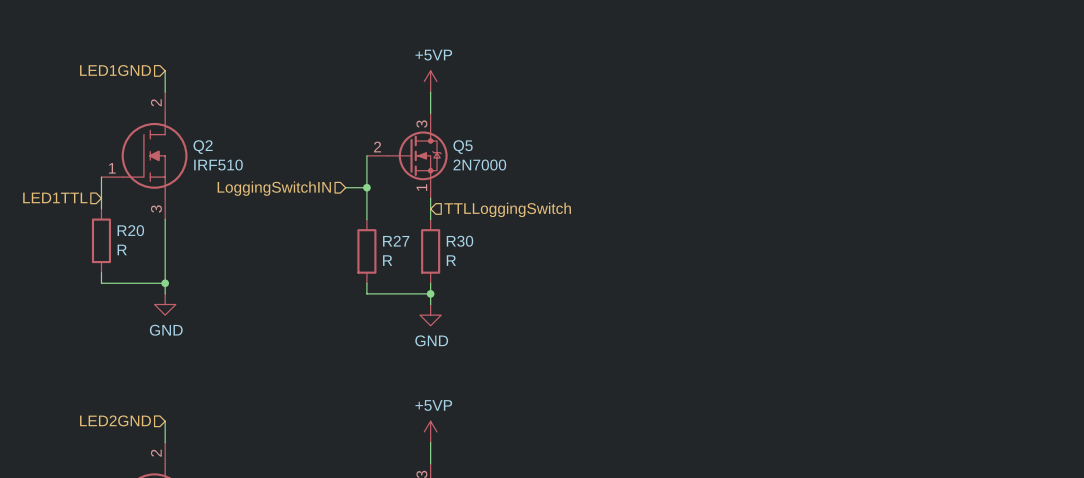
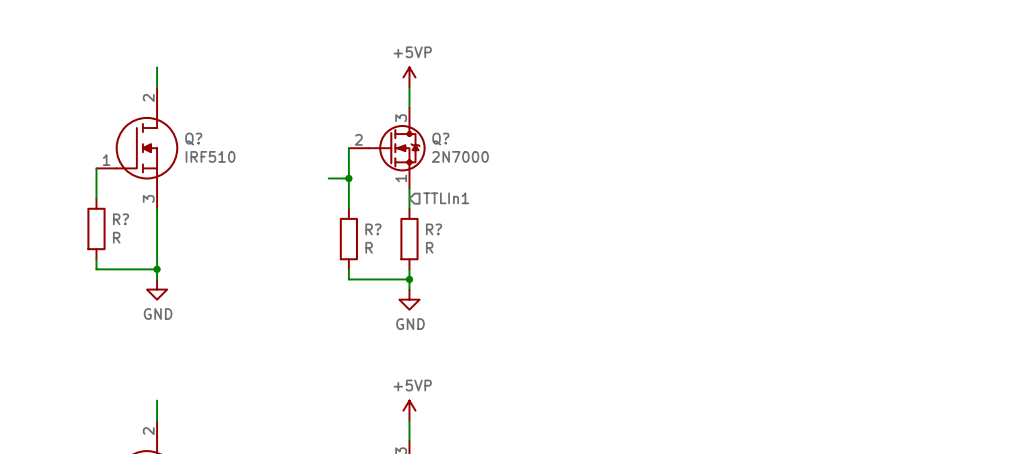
hierarchical label: LED1GND (115, 70) -> none
Q2 name: Q2 (203, 147) -> Q? (193, 139)
Q5 name: Q5 (463, 147) -> Q? (440, 139)
hierarchical label: LoggingSwitchIN (274, 188) -> none
hierarchical label: LED1TTL (55, 197) -> none
hierarchical label: TTLLoggingSwitch (507, 209) -> TTLIn1 (446, 198)
R20 name: R20 (130, 230) -> R? (121, 219)
R27 name: R27 (396, 241) -> R? (373, 229)
R30 name: R30 (459, 241) -> R? (434, 229)
hierarchical label: LED2GND (115, 420) -> none

